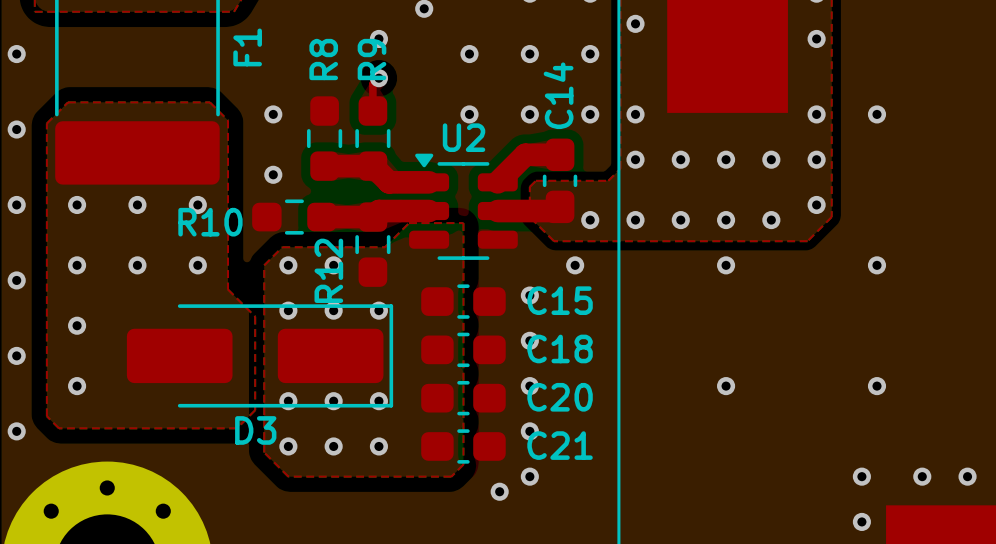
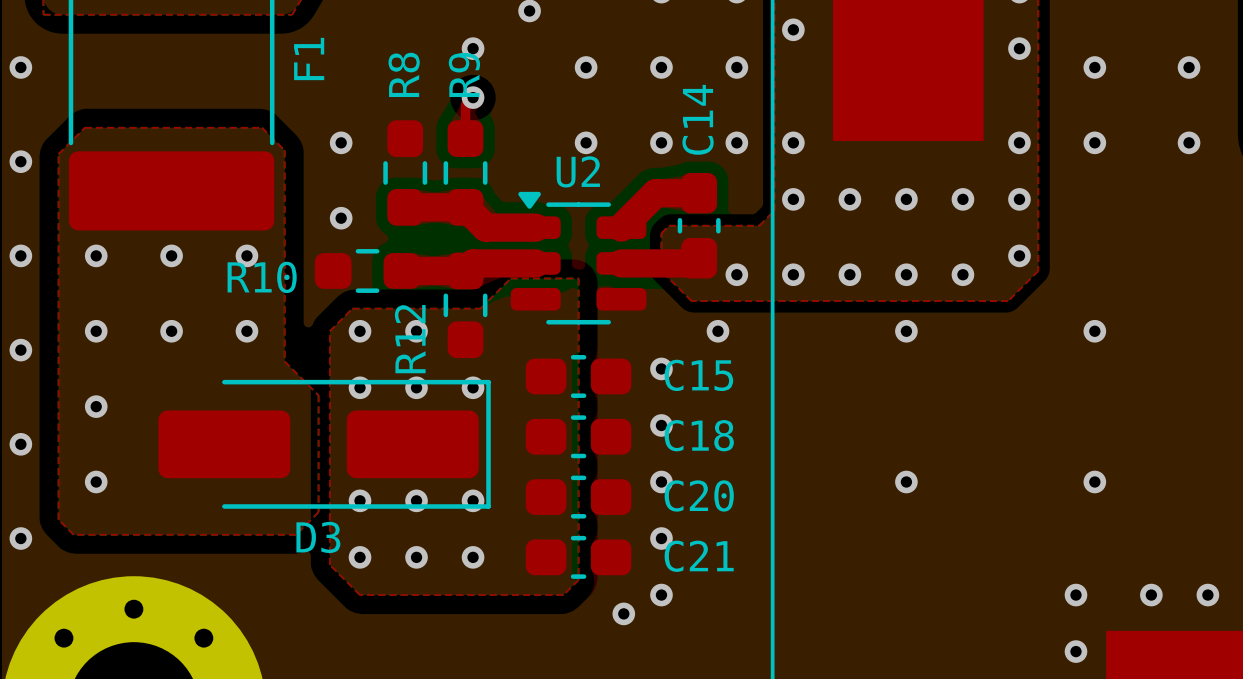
via: none -> (1094, 67)
via: none -> (1189, 67)
via: none -> (1189, 142)

